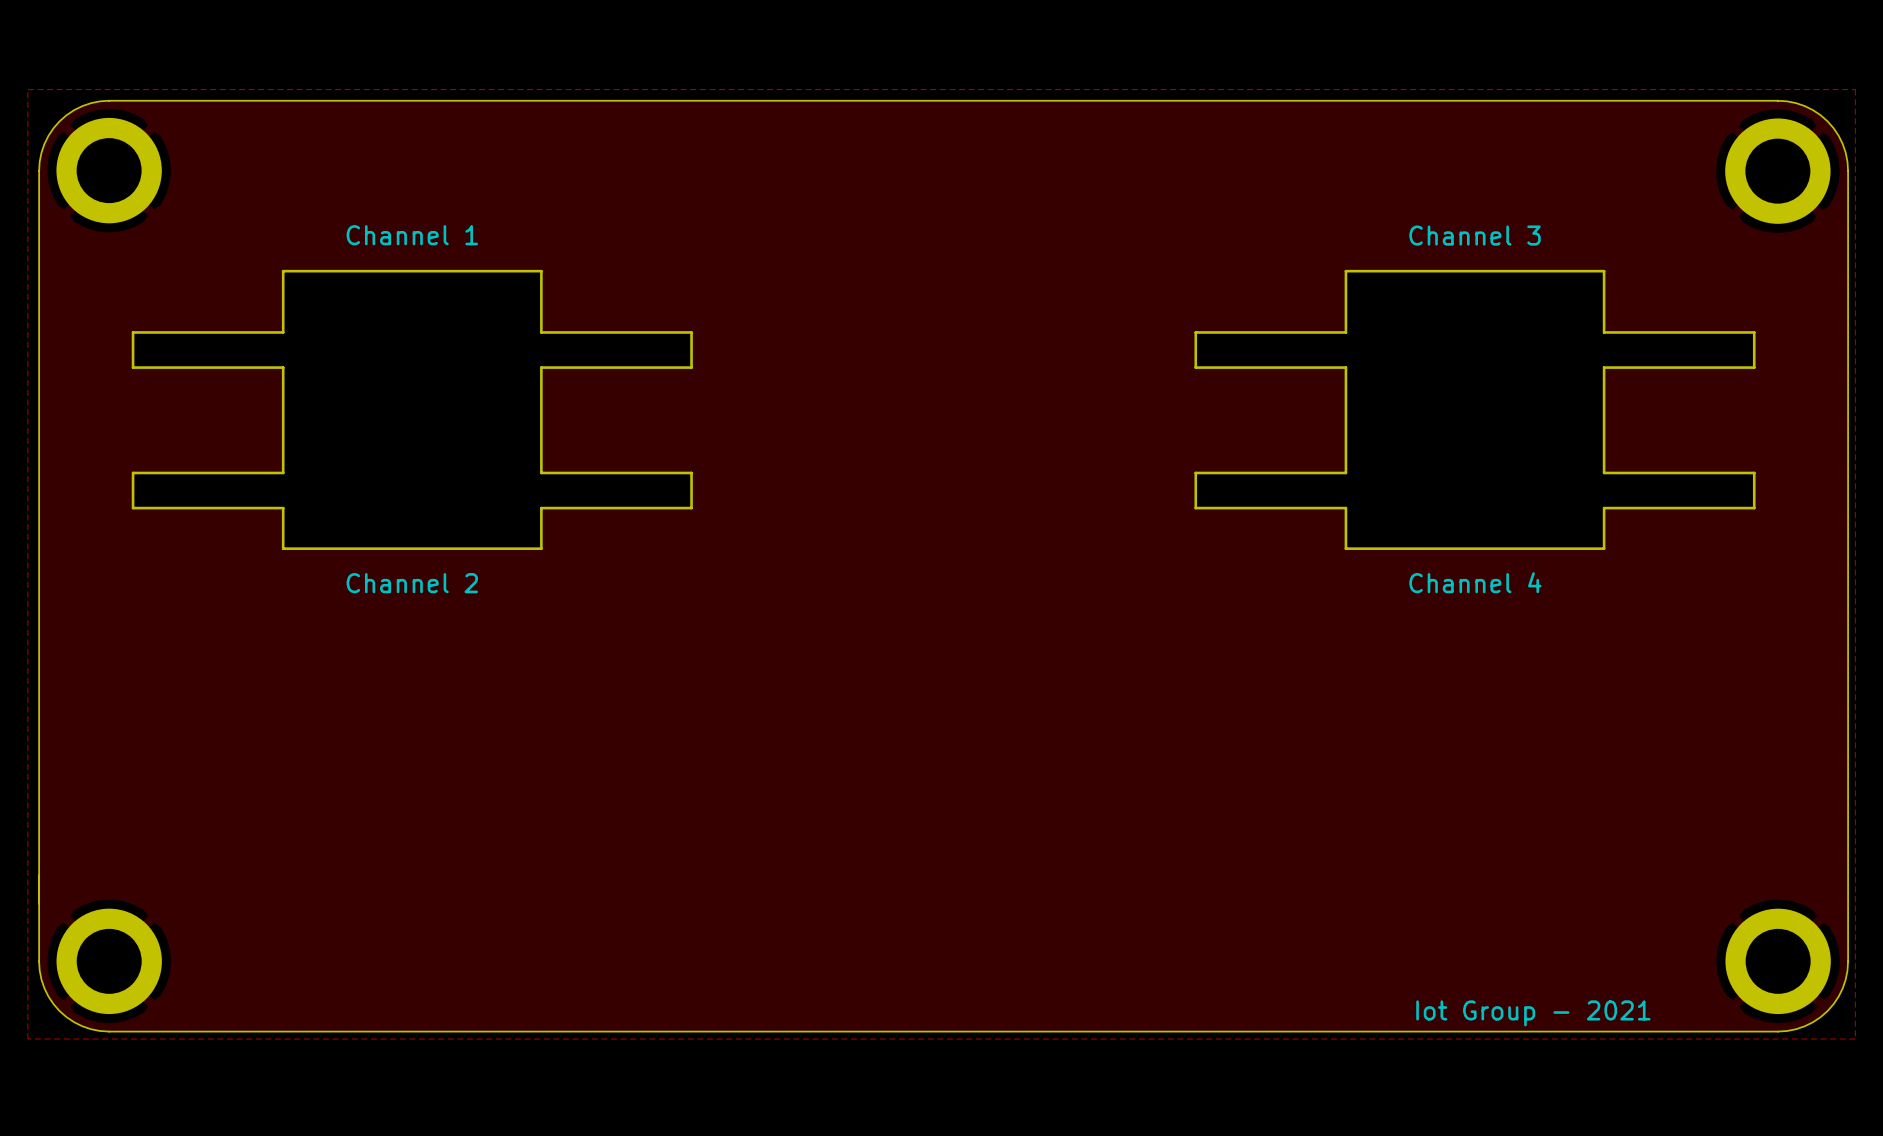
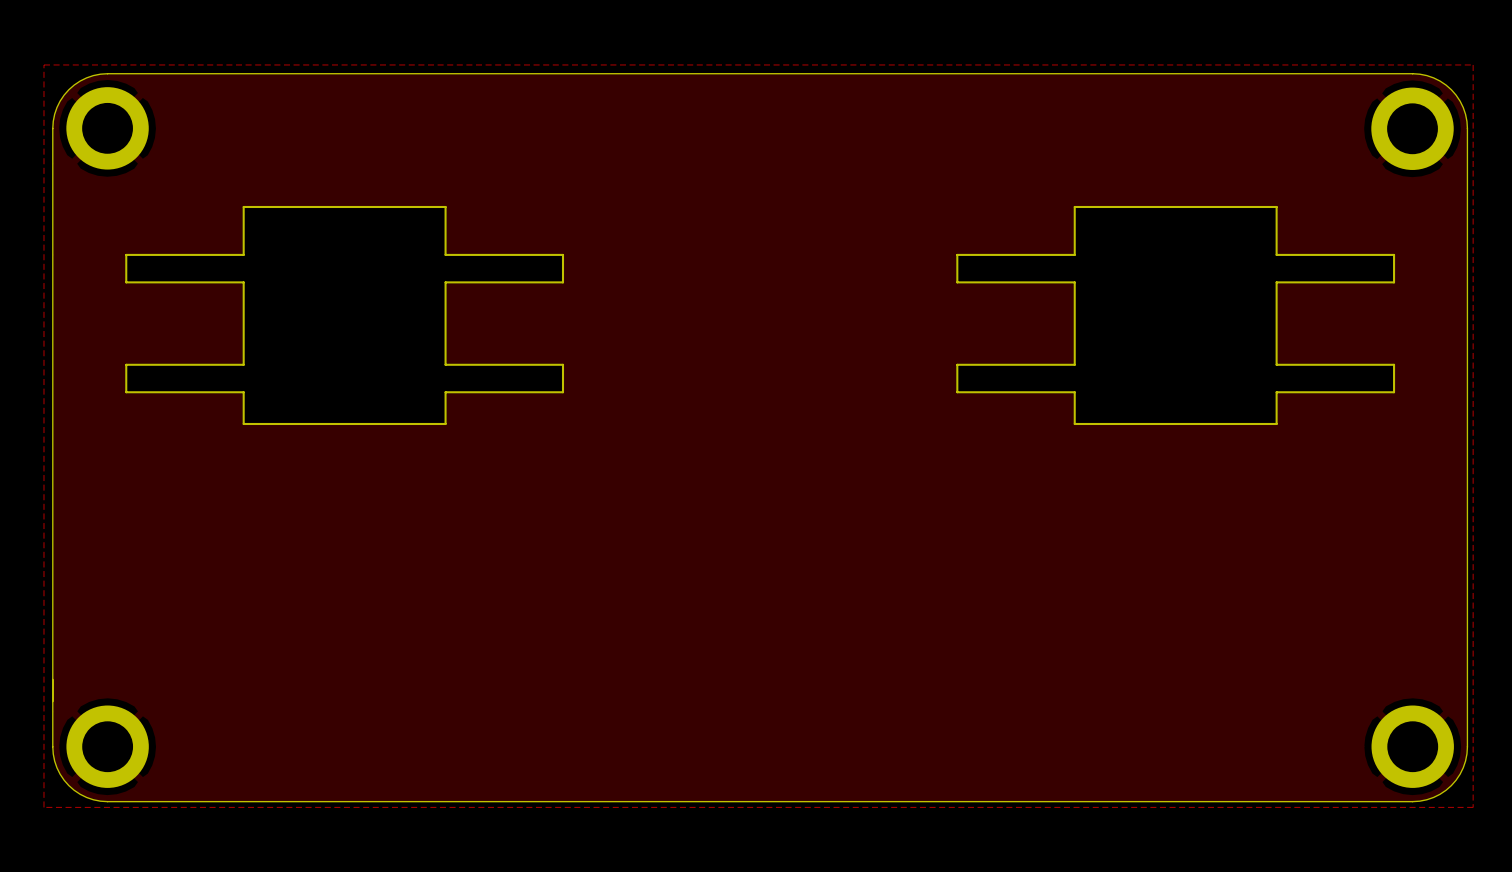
text: Channel 1 (412, 235) -> none
text: Channel 3 (1475, 235) -> none
text: Channel 4 (1475, 582) -> none
text: Channel 2 (412, 583) -> none
text: Iot Group - 2021 (1533, 1013) -> none

